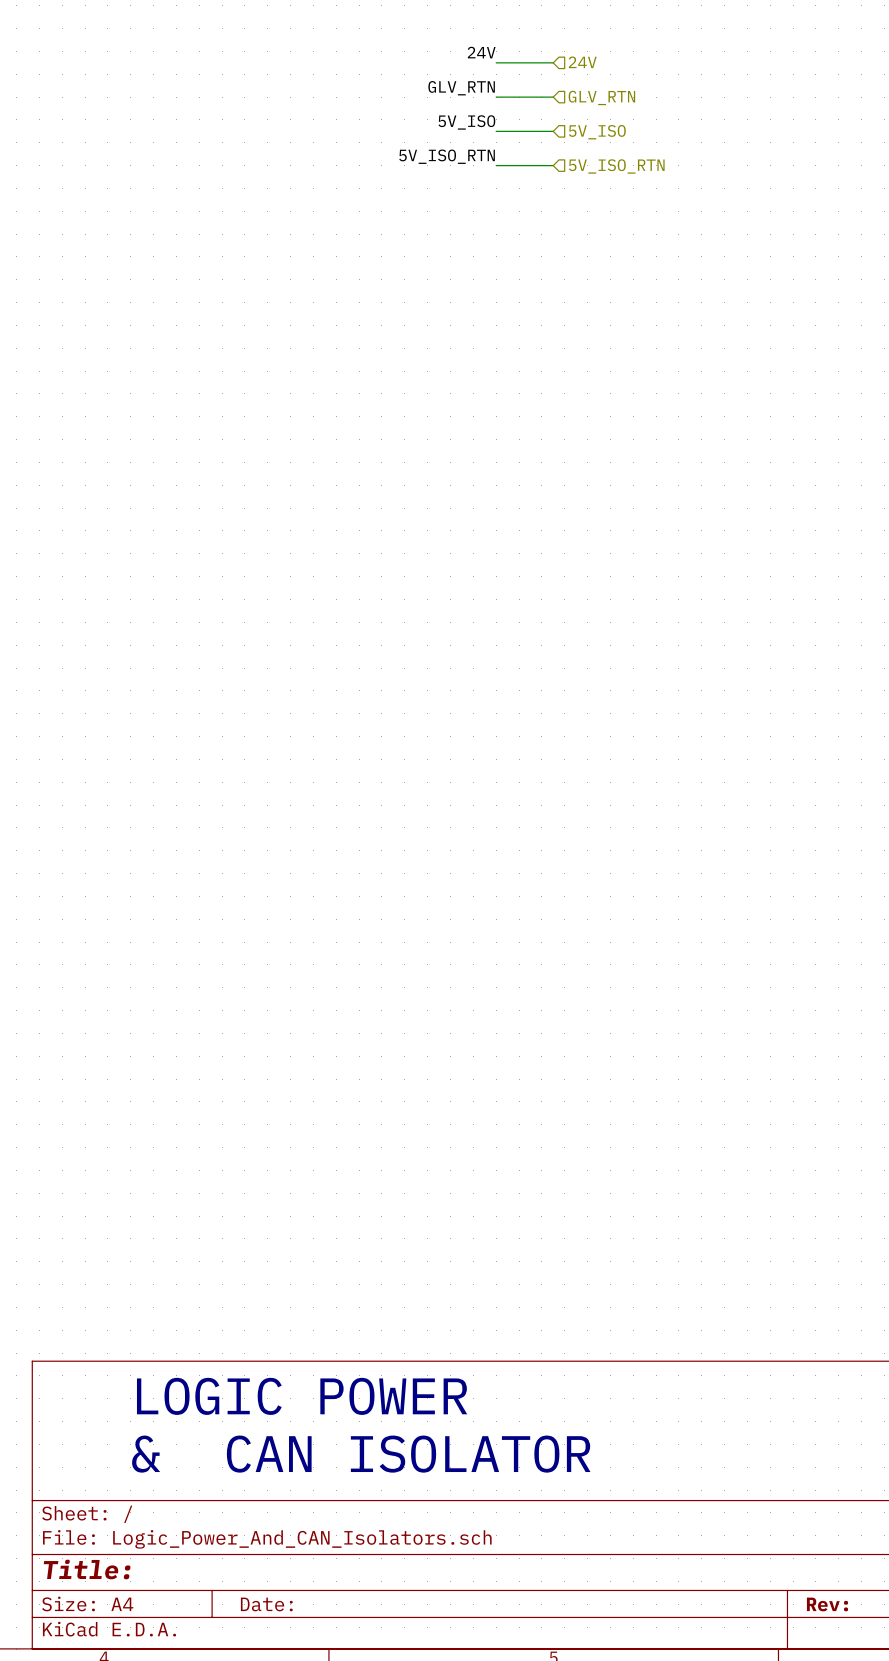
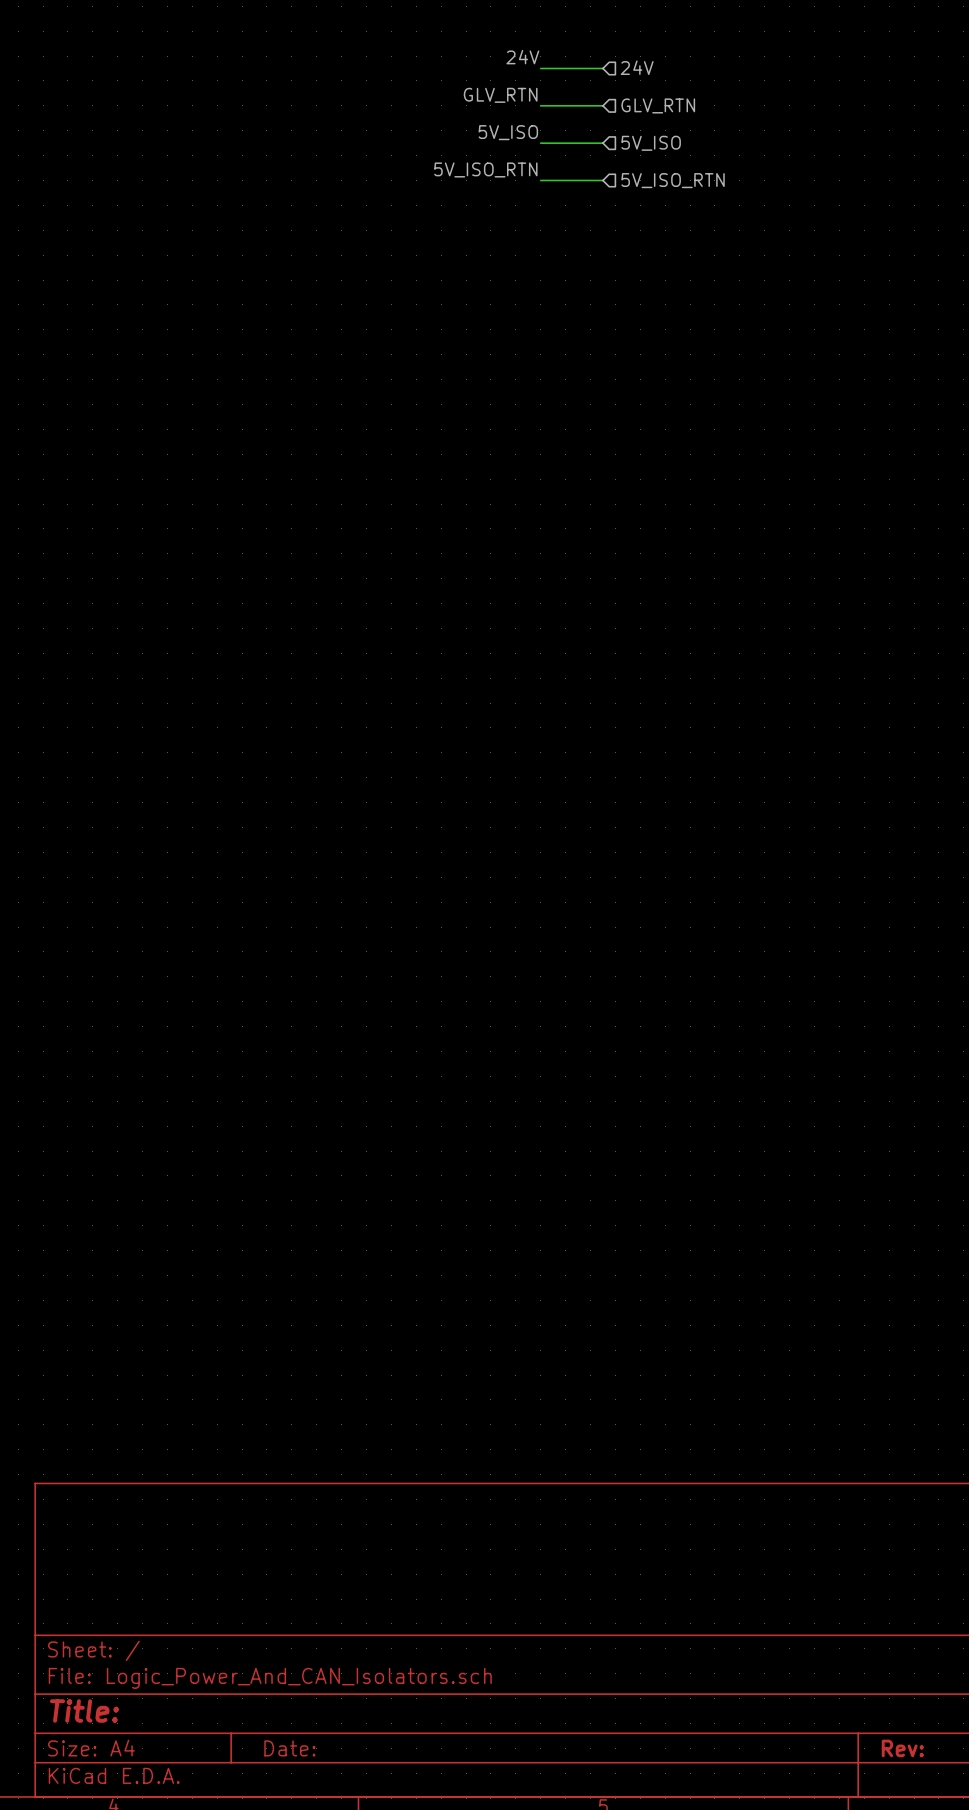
text: LOGIC POWER (302, 1396) -> none
text: & CAN ISOLATOR (361, 1454) -> none

